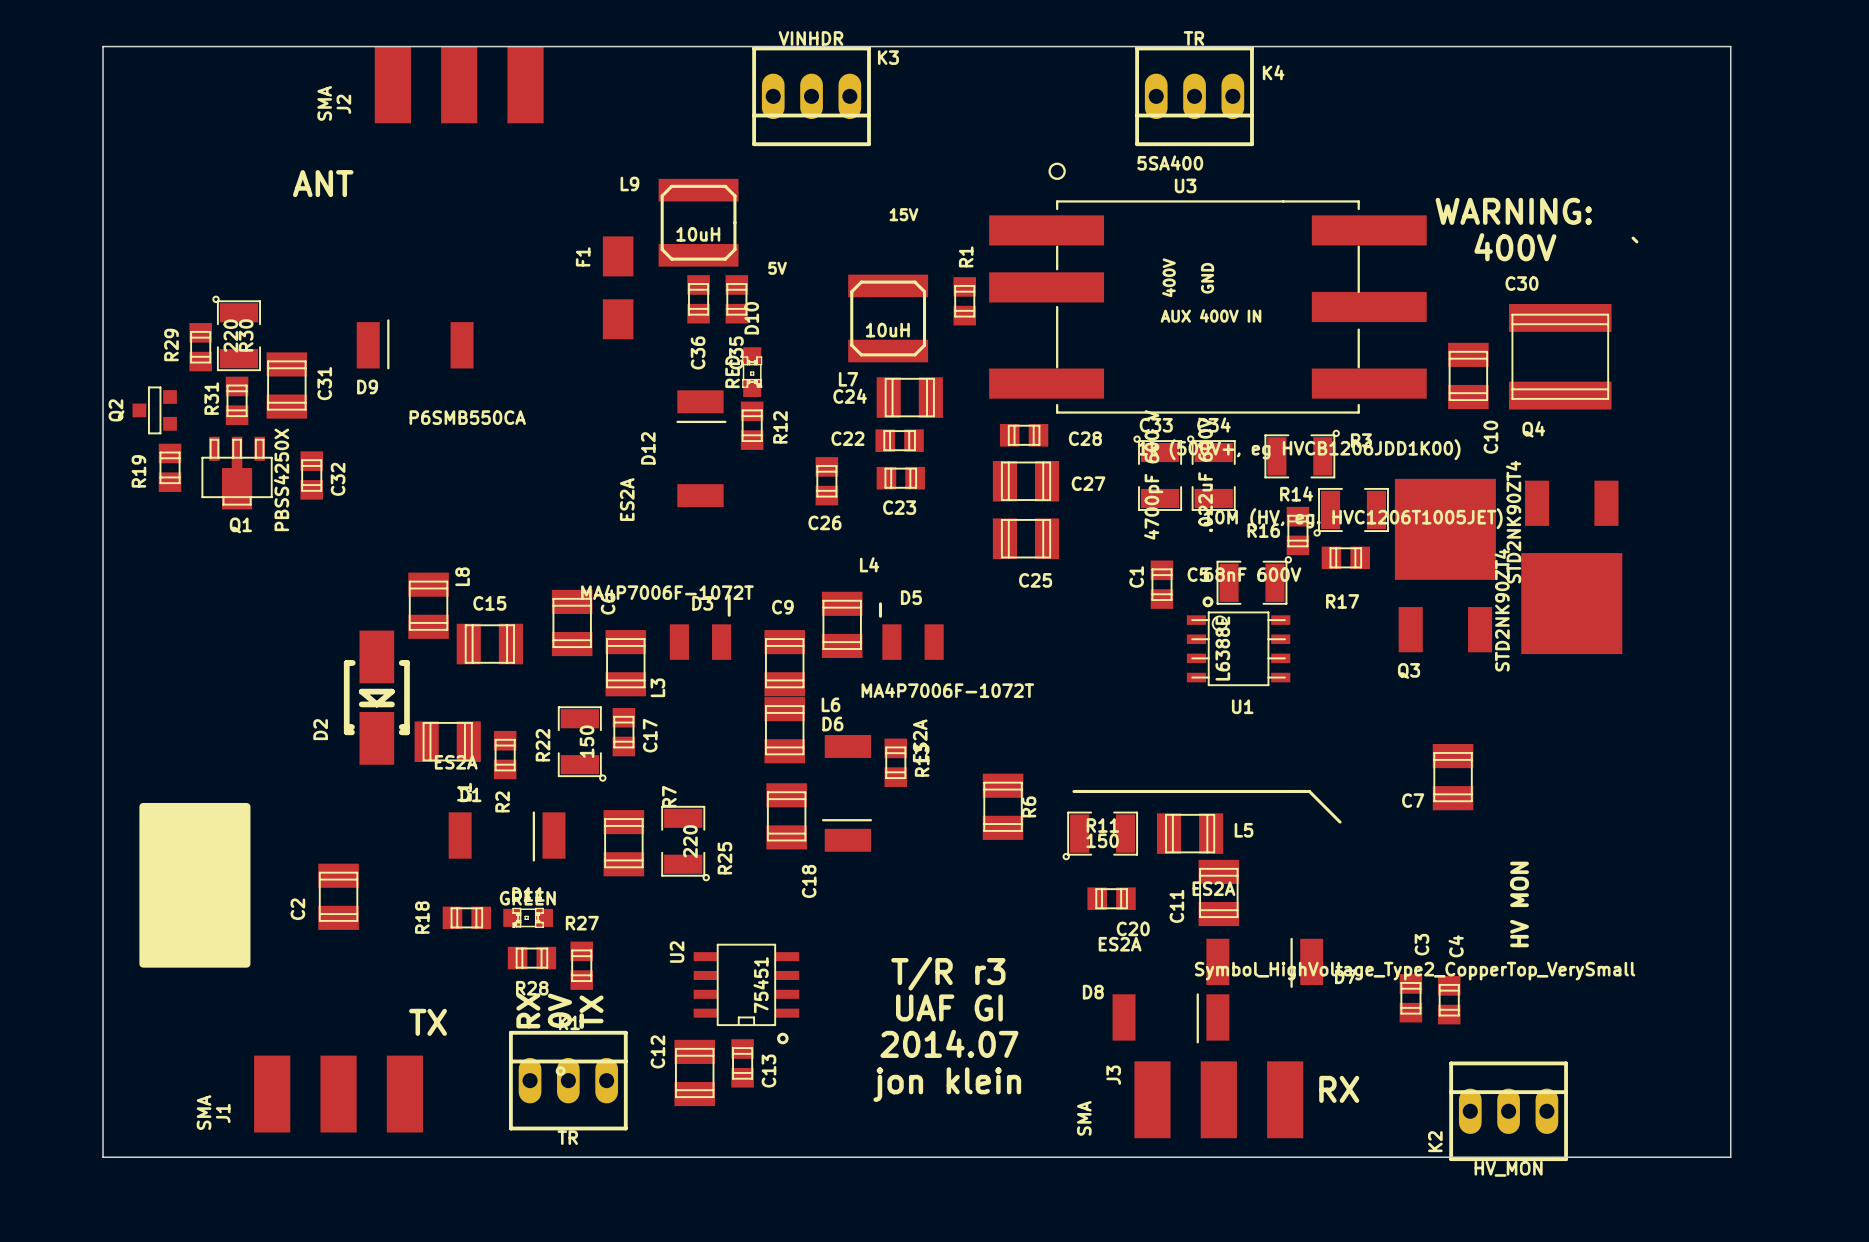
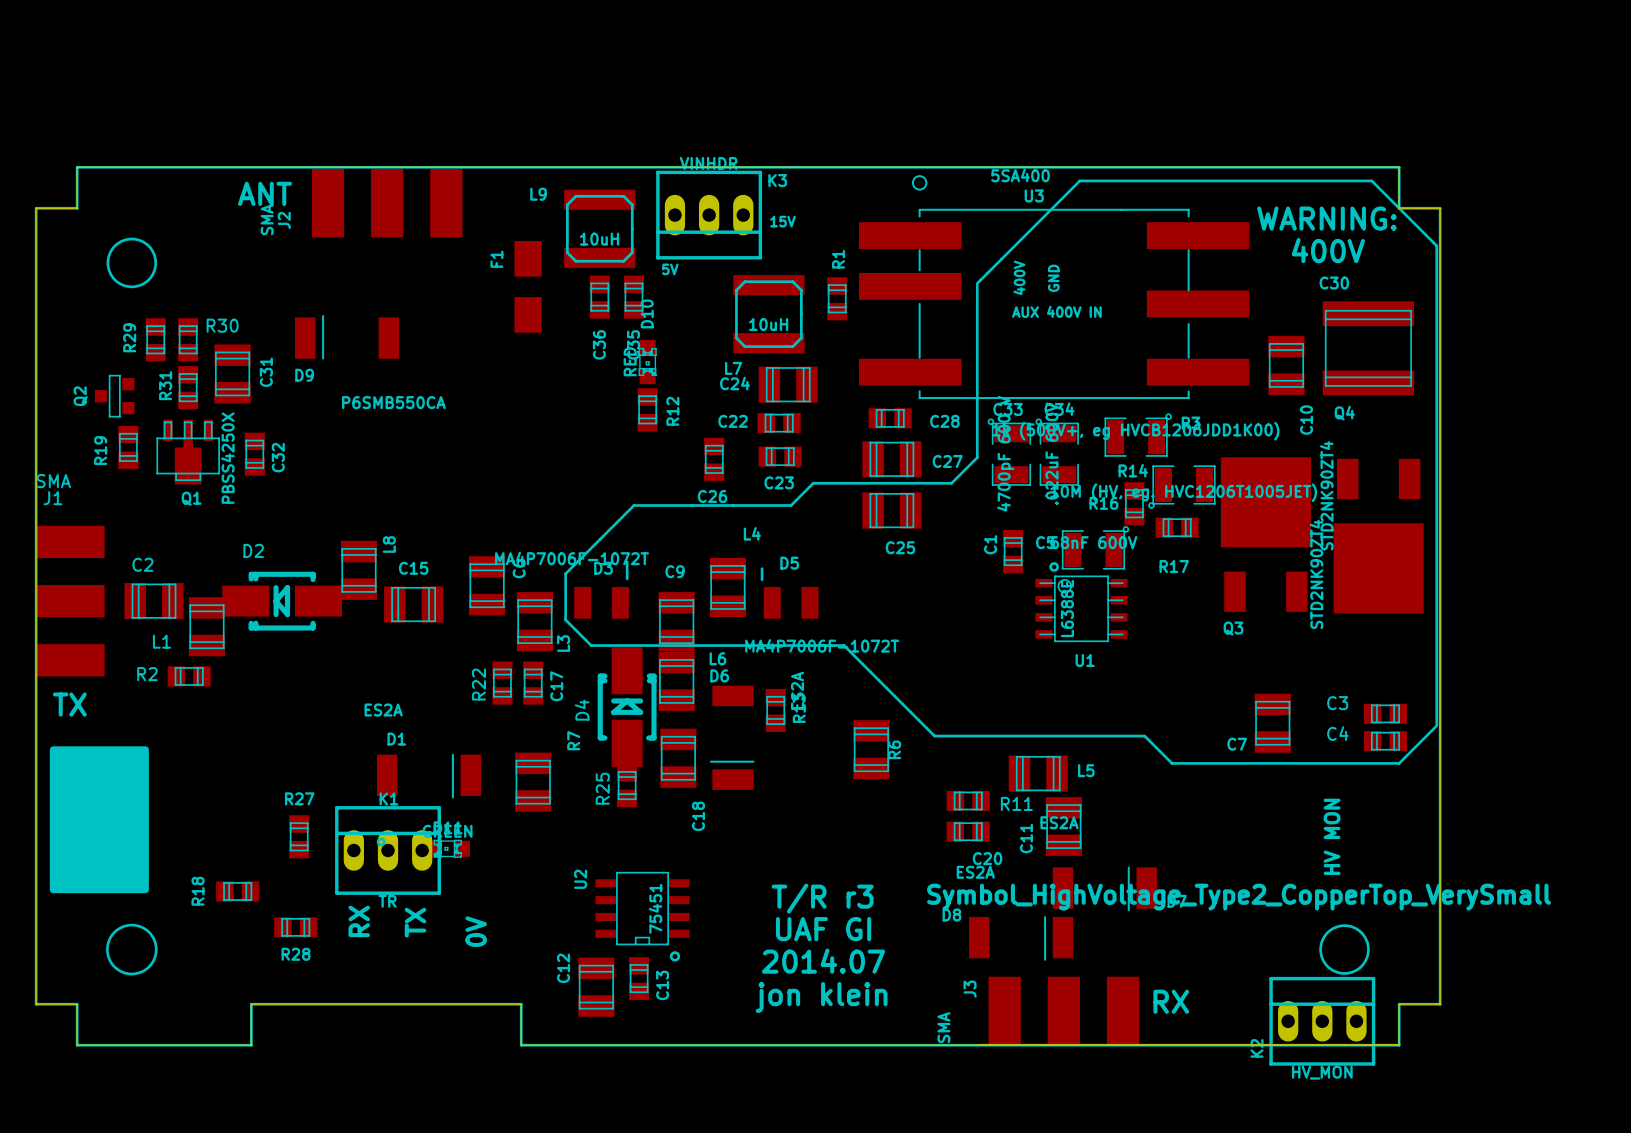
board edge: (103, 46) (103, 1157) (1730, 1157) (1730, 46) (103, 46) -> (77, 167) (77, 208) (36, 208) (36, 1004) (77, 1004) (77, 1045) (251, 1045) (251, 1004) (521, 1004) (521, 1045) (1399, 1045) (1399, 1004) (1440, 1004) (1440, 208) (1399, 208) (1399, 167) (77, 167)
J2 position: (459, 84) -> (387, 203)
K3 position: (811, 96) -> (709, 215)
K4: TR (1194, 96) -> none
line: none -> (77, 167) (77, 208) (36, 208) (36, 1004) (77, 1004) (77, 1045) (251, 1045) (251, 1004) (521, 1004) (521, 1045) (1399, 1045) (1399, 1004) (1440, 1004) (1440, 208) (1399, 208) (1399, 167) (77, 167)
drawing: none -> [106, 237, 158, 289]
line: none -> (1433, 242) (1371, 180) (1079, 180) (977, 283)
line: none -> (1436, 245) (1436, 724)
line: none -> (977, 285) (977, 457) (951, 483) (813, 483) (791, 505) (633, 505) (565, 573) (565, 619) (591, 645) (844, 645) (934, 736)
R30 footprint: [212, 295, 261, 372] -> [178, 318, 199, 362]
R30 name position: R30 (246, 335) -> R30 (222, 325)
R30 value: 220 (230, 336) -> none
D12: ES2A (701, 448) -> none
D2 rotation: 0° (376, 697) -> 90° clockwise (282, 601)
R22 footprint: [557, 706, 607, 782] -> [492, 661, 513, 705]
L1 rotation: 0° (447, 741) -> 90° clockwise (206, 626)
L1 position: (447, 741) -> (206, 626)
R22 value: 150 (587, 741) -> none
R2 rotation: 0° (505, 755) -> 90° clockwise (189, 676)
R2 position: (505, 755) -> (189, 676)
text: none -> TX (69, 704)
D4: none -> (627, 707)
line: none -> (1436, 725) (1399, 763) (1172, 763)
R25 footprint: [661, 805, 710, 882] -> [617, 764, 638, 808]
R11 footprint: [1062, 811, 1139, 861] -> [946, 790, 990, 812]
R11 name position: R11 (1102, 825) -> R11 (1016, 803)
R11 value: 150 (1102, 840) -> none
R25 value: 220 (690, 841) -> none
R25 name position: R25 (724, 858) -> R25 (602, 788)
drawing position: (194, 885) -> (99, 819)
C2 rotation: 0° (338, 896) -> 90° clockwise (154, 601)
C2 position: (338, 896) -> (154, 601)
R18 position: (466, 917) -> (237, 891)
R28 position: (531, 958) -> (295, 927)
drawing shape: [1194, 961, 1636, 981] -> [927, 883, 1551, 911]
R27 position: (581, 965) -> (299, 836)
C3 rotation: 0° (1410, 998) -> 90° counterclockwise (1385, 713)
C3 position: (1410, 998) -> (1385, 713)
text: none -> TX (415, 922)
C4 rotation: 0° (1449, 1000) -> 90° counterclockwise (1385, 741)
C4 position: (1449, 1000) -> (1385, 741)
drawing: none -> [106, 923, 158, 976]
drawing: none -> [1319, 924, 1370, 975]
text position: RX (528, 1010) -> RX (359, 921)
text: TX (591, 1012) -> none
text: TX (428, 1022) -> none
drawing position: (560, 1071) -> (381, 841)
K1 position: (568, 1080) -> (388, 850)
J1 rotation: 0° (338, 1094) -> 90° clockwise (70, 601)
J1 position: (338, 1094) -> (70, 601)

